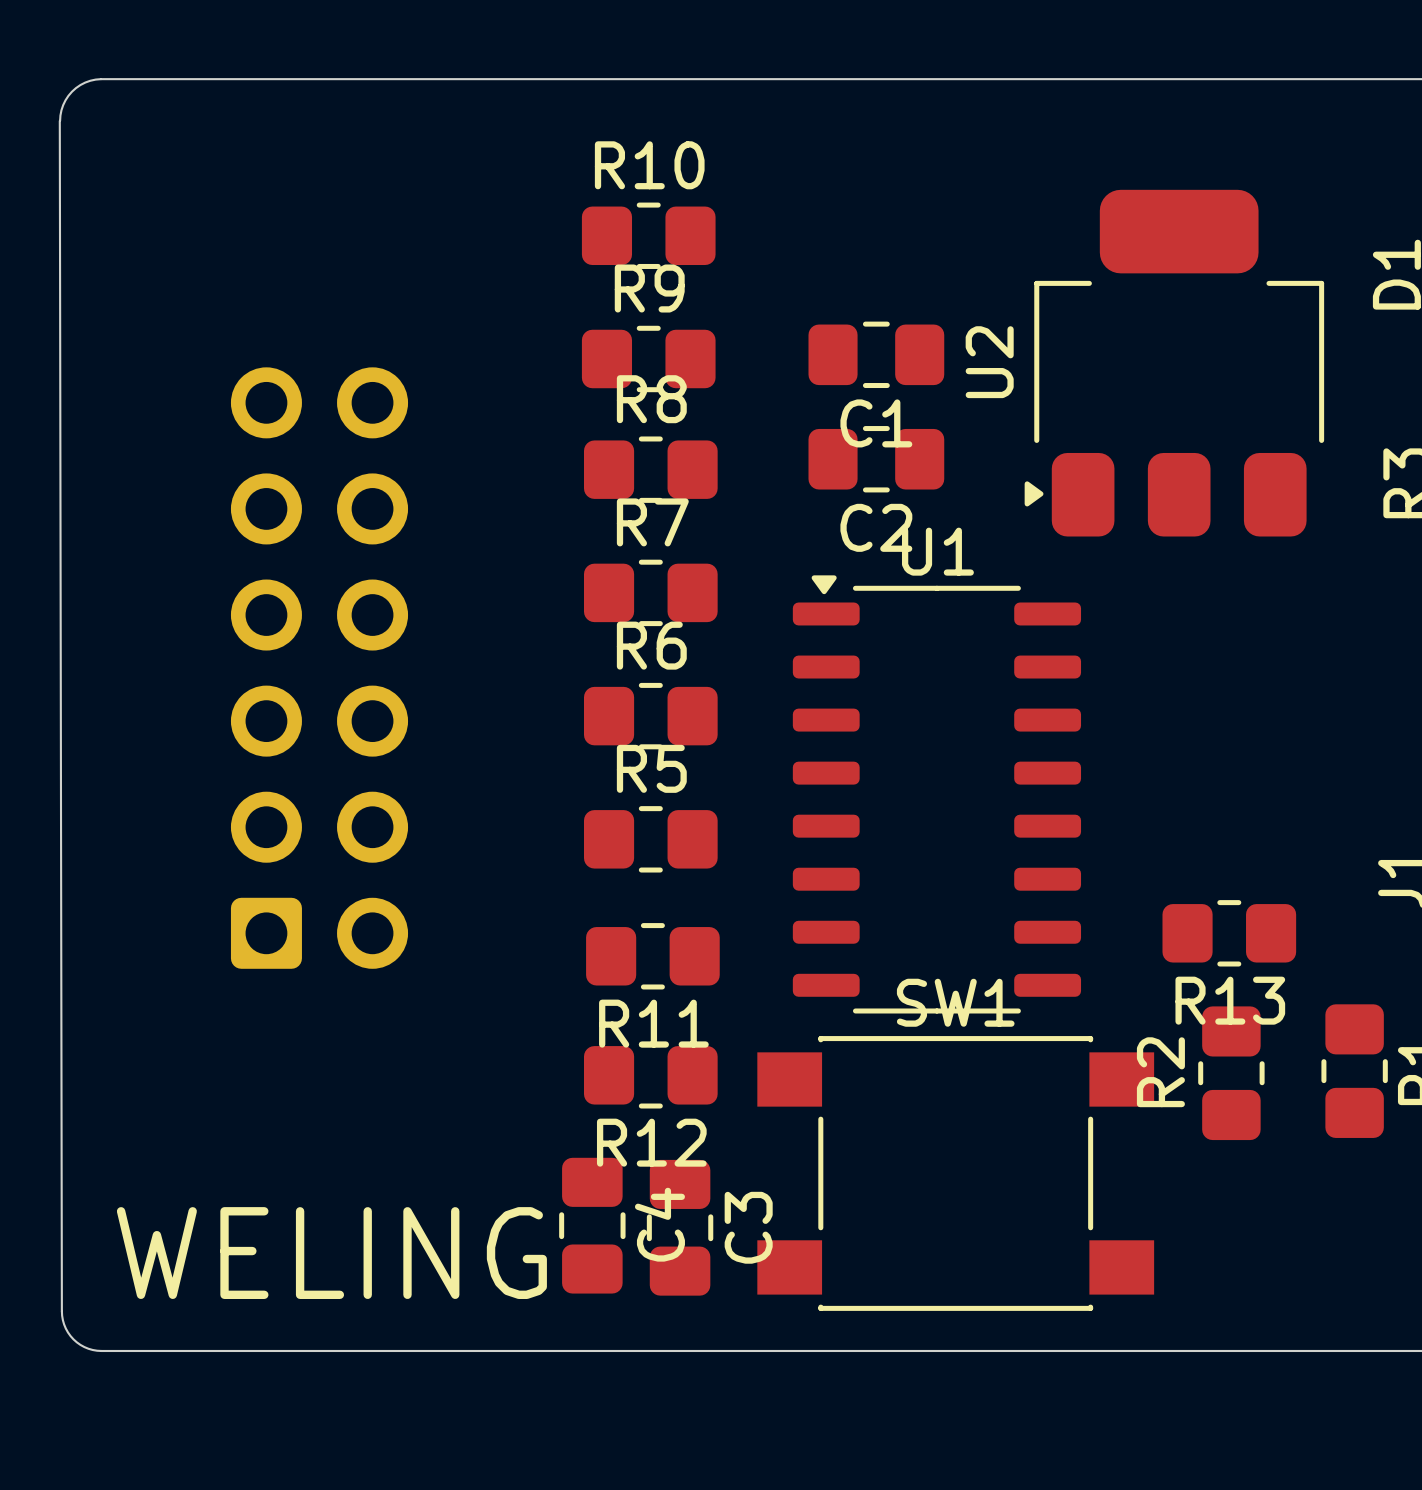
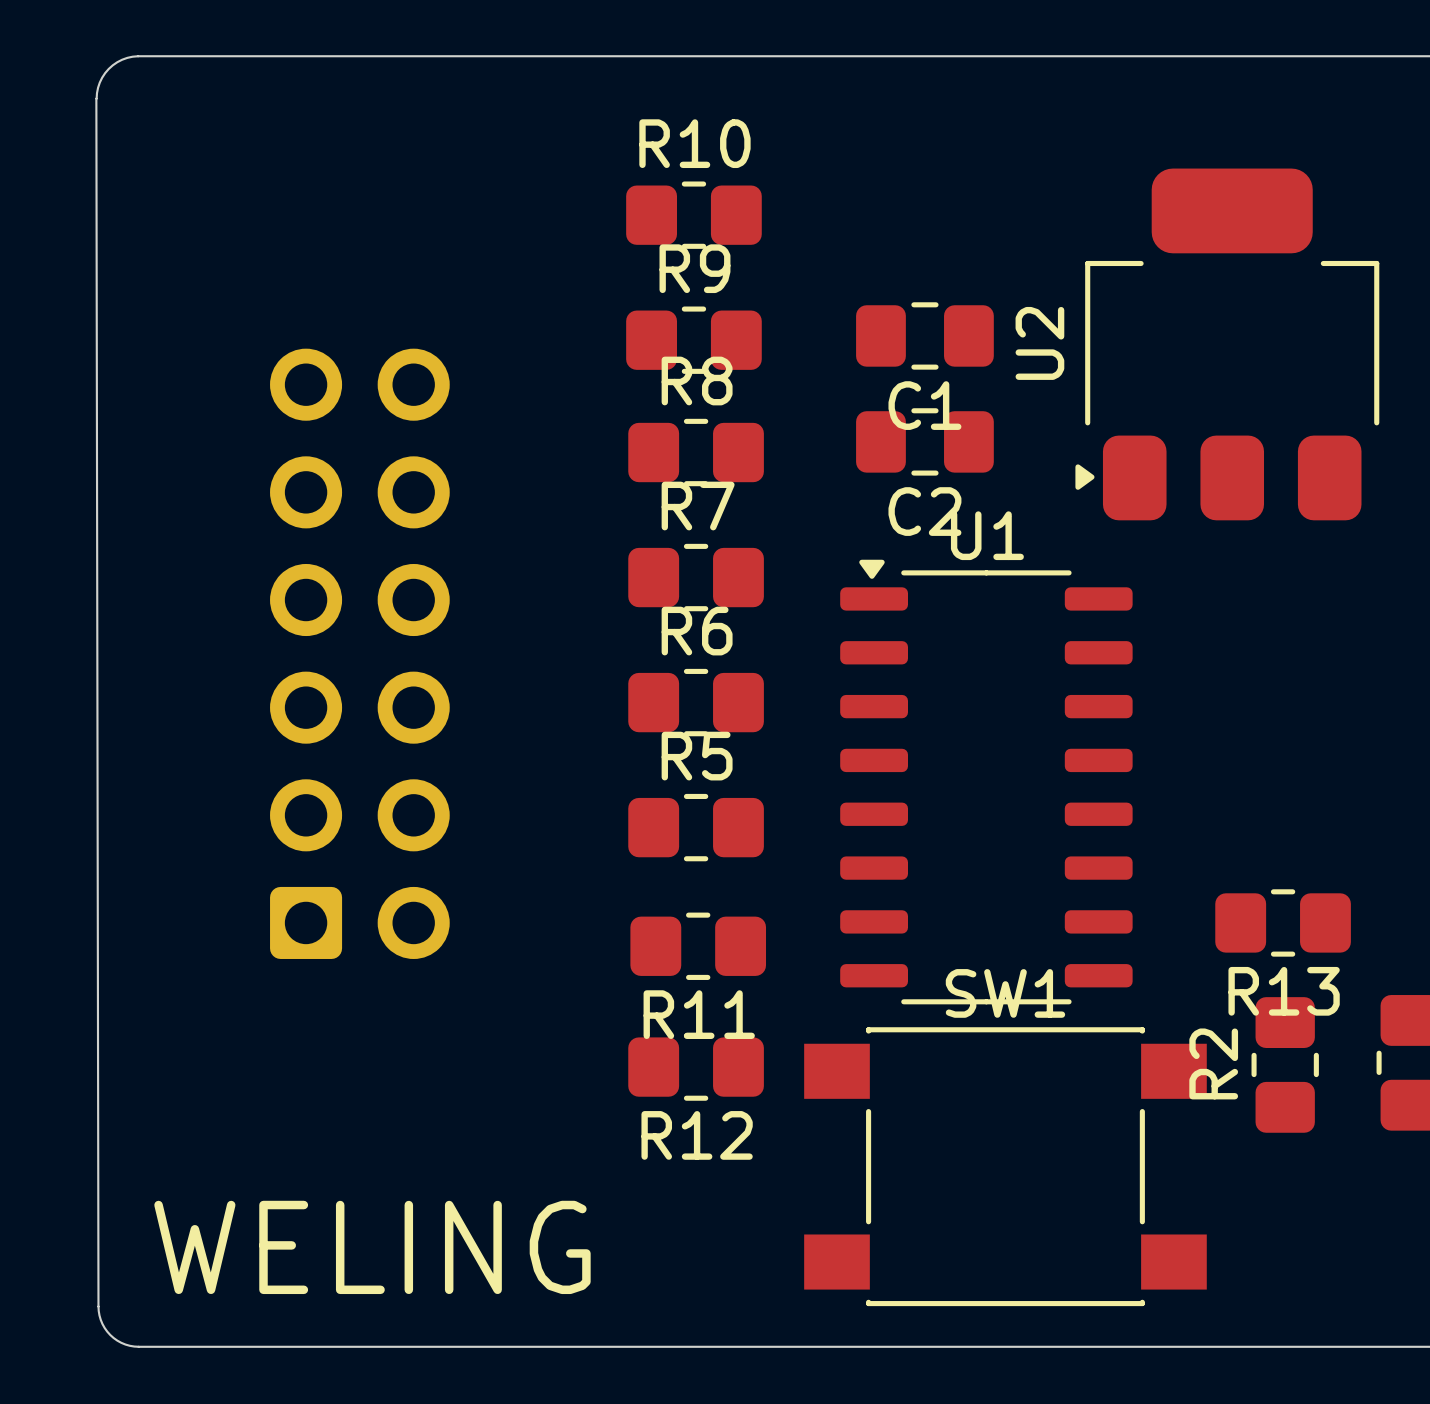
C4: (592, 1225) -> none
C3: (680, 1227) -> none

